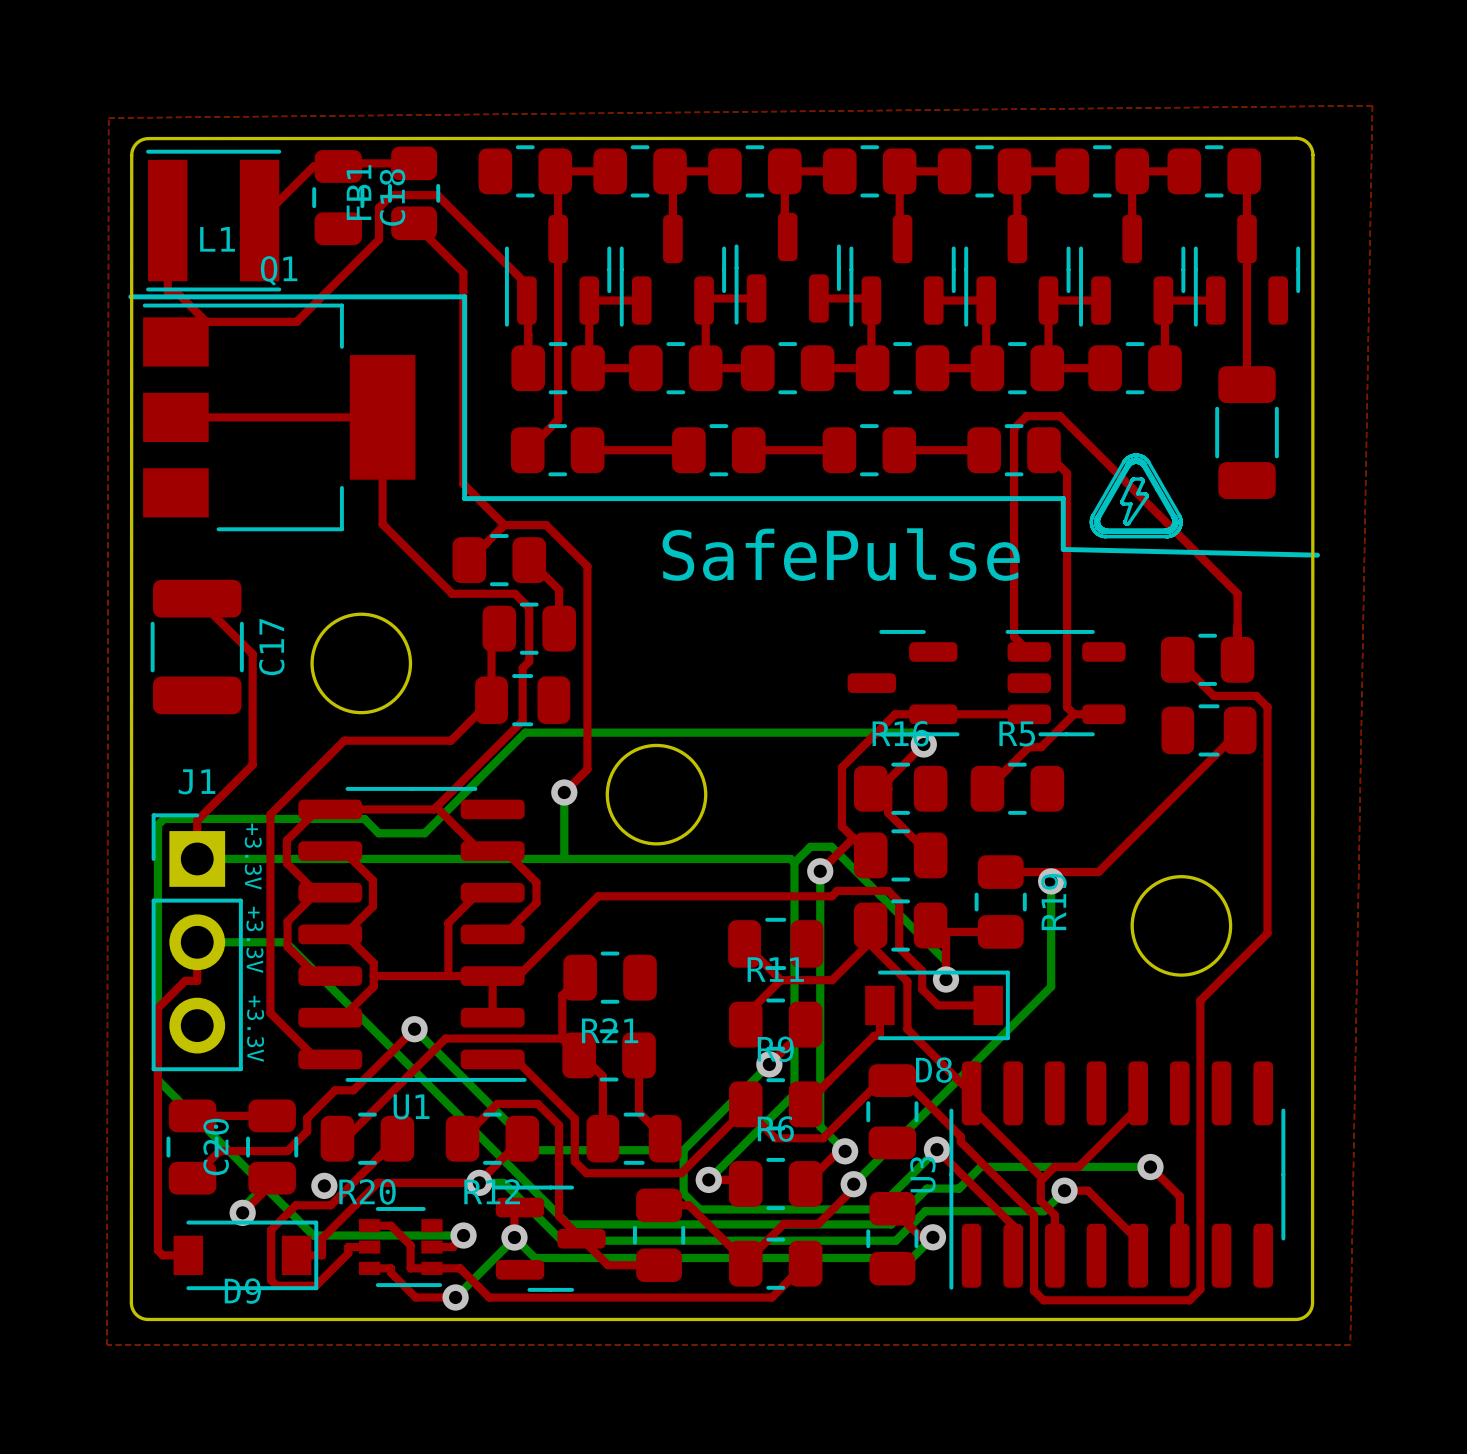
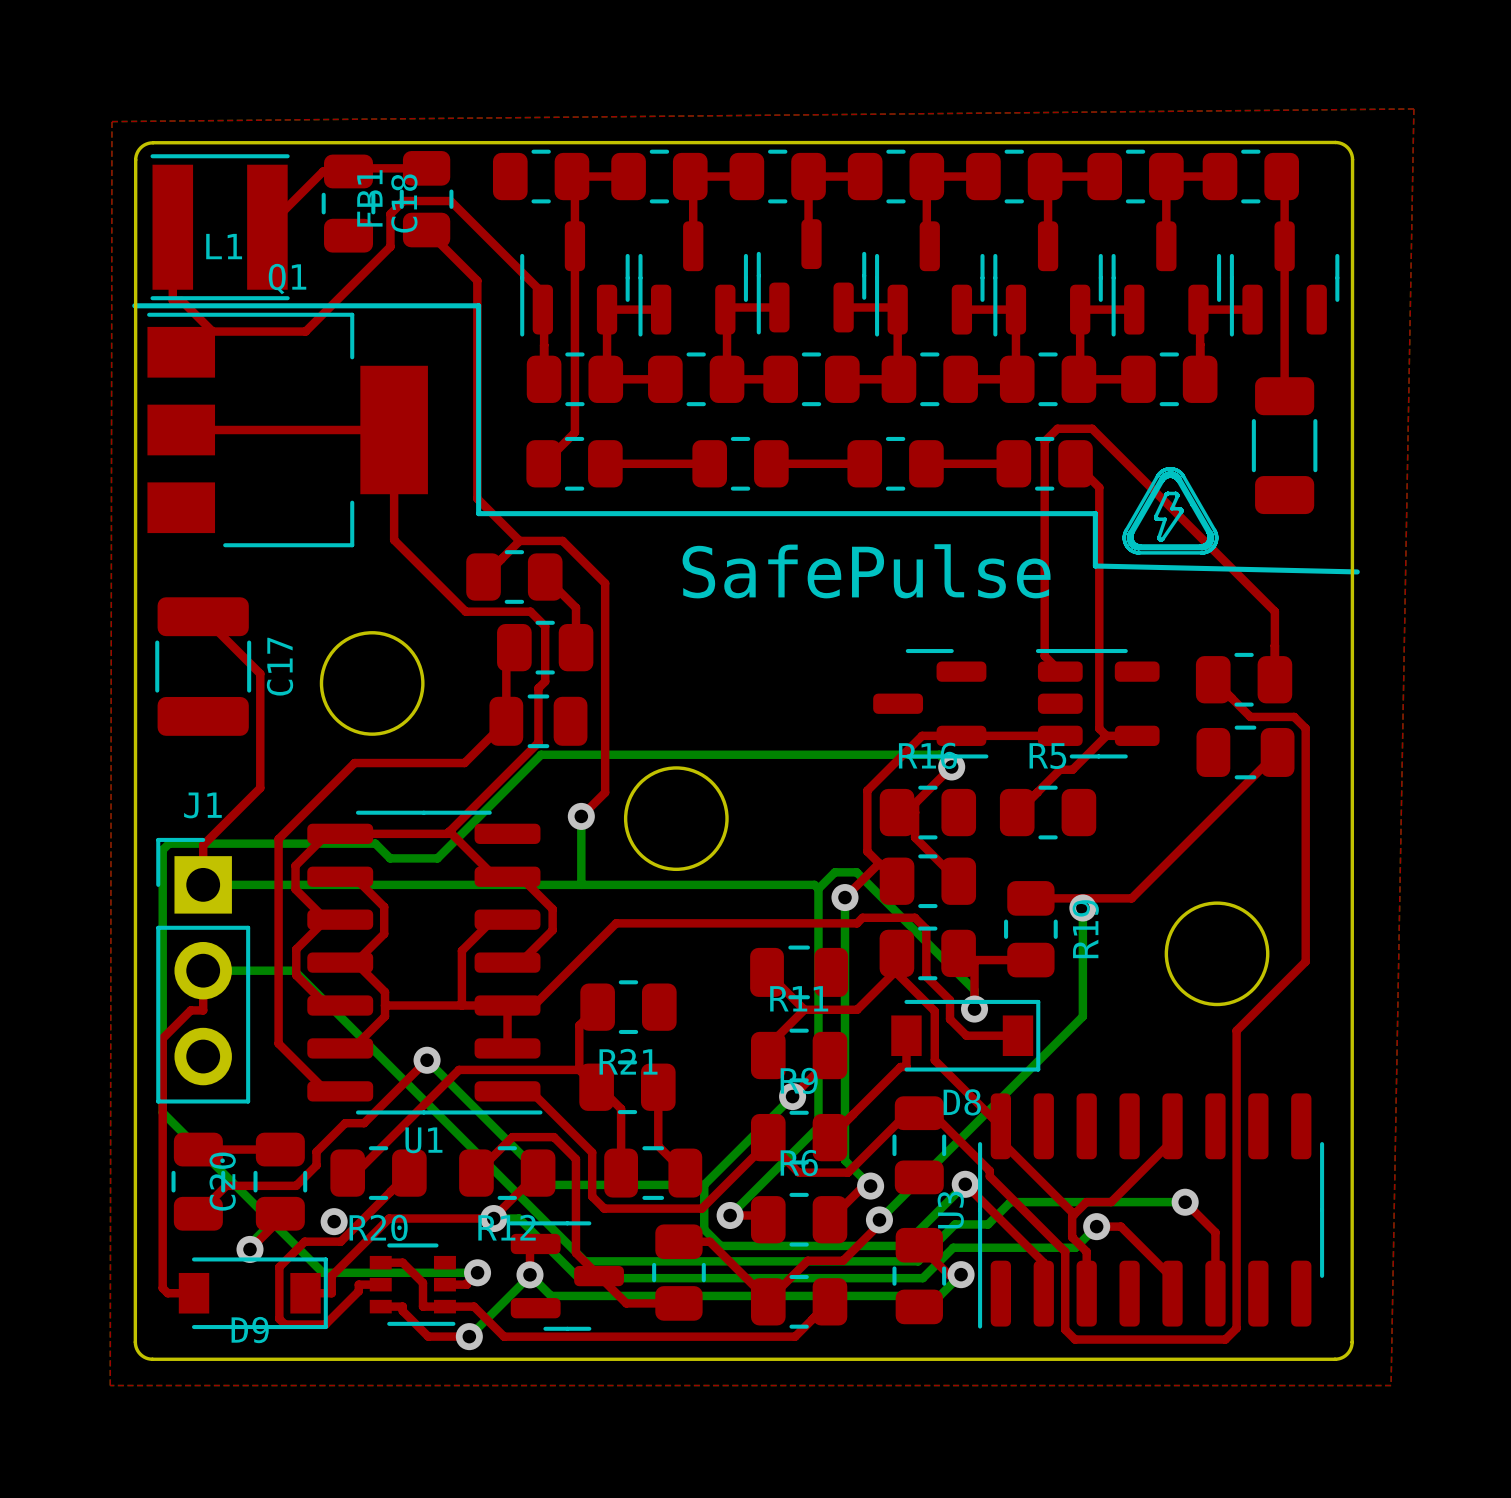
text: +3.3V (253, 856) -> none
text: +3.3V (254, 939) -> none
text: +3.3V (255, 1028) -> none

